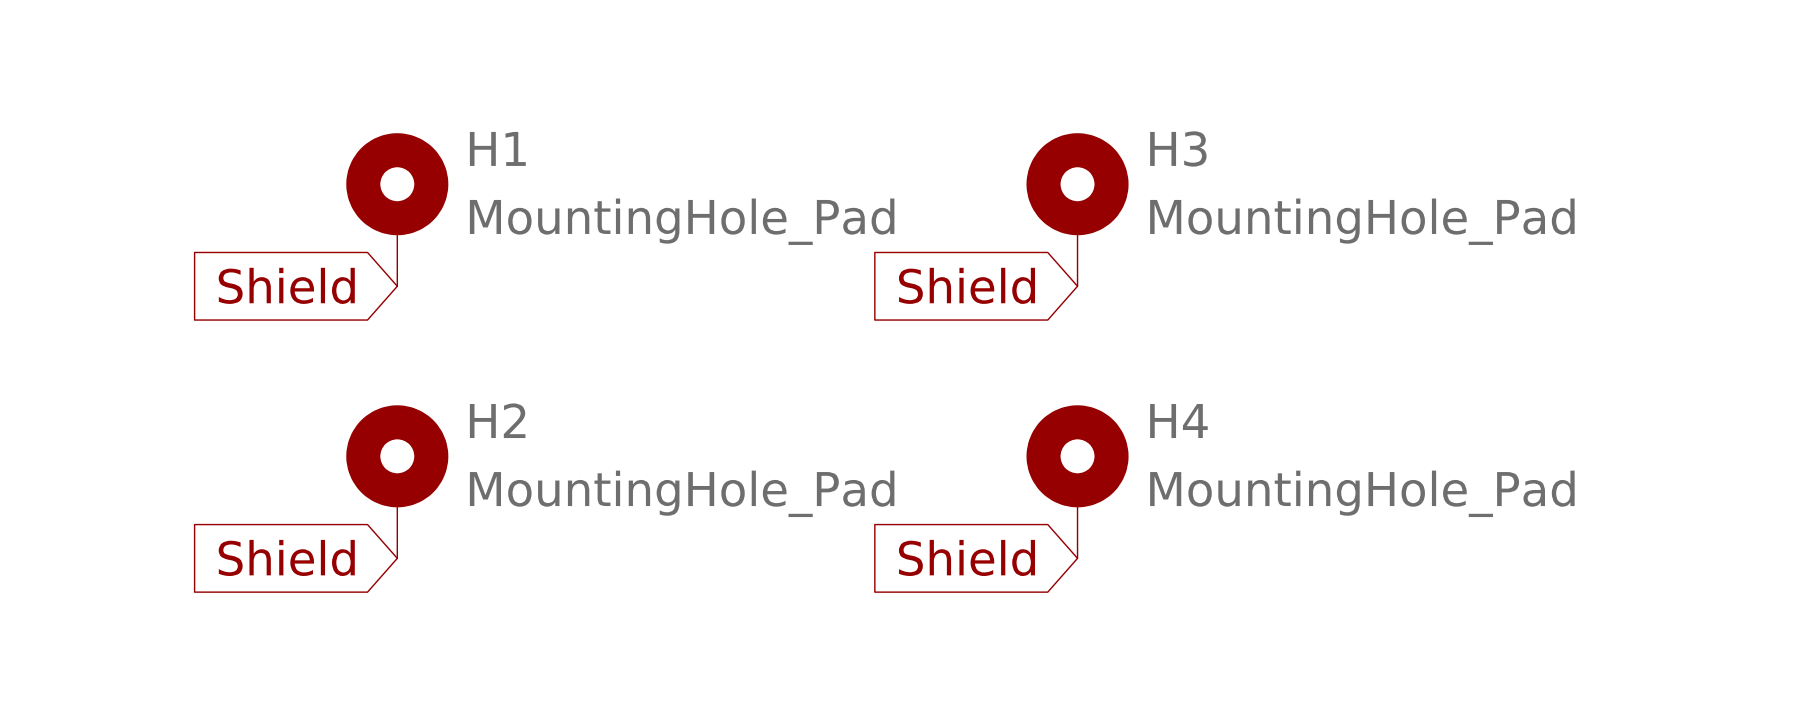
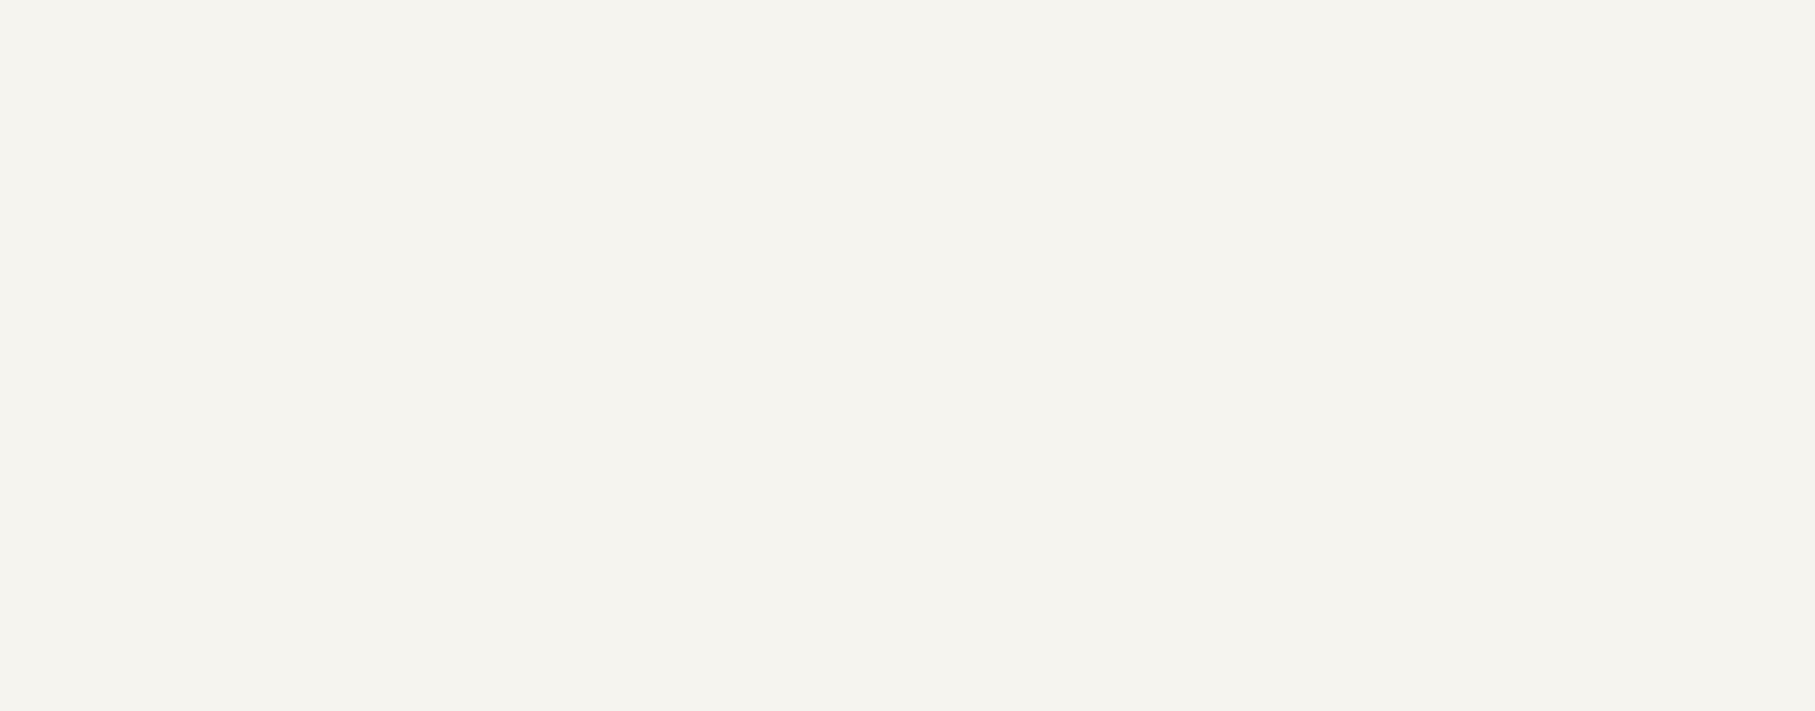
H1: MountingHole_Pad (397, 209) -> none
H3: MountingHole_Pad (1077, 209) -> none
global label: Shield (286, 285) -> none
global label: Shield (966, 285) -> none
H2: MountingHole_Pad (397, 481) -> none
H4: MountingHole_Pad (1077, 481) -> none
global label: Shield (286, 557) -> none
global label: Shield (966, 557) -> none

